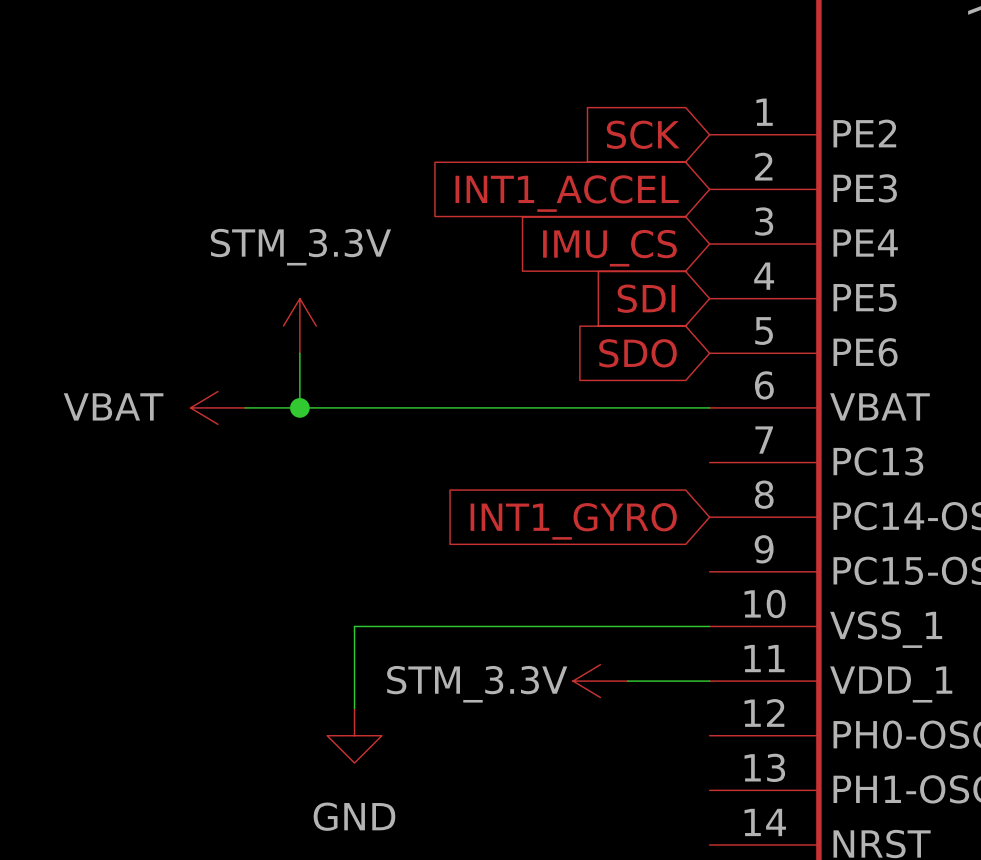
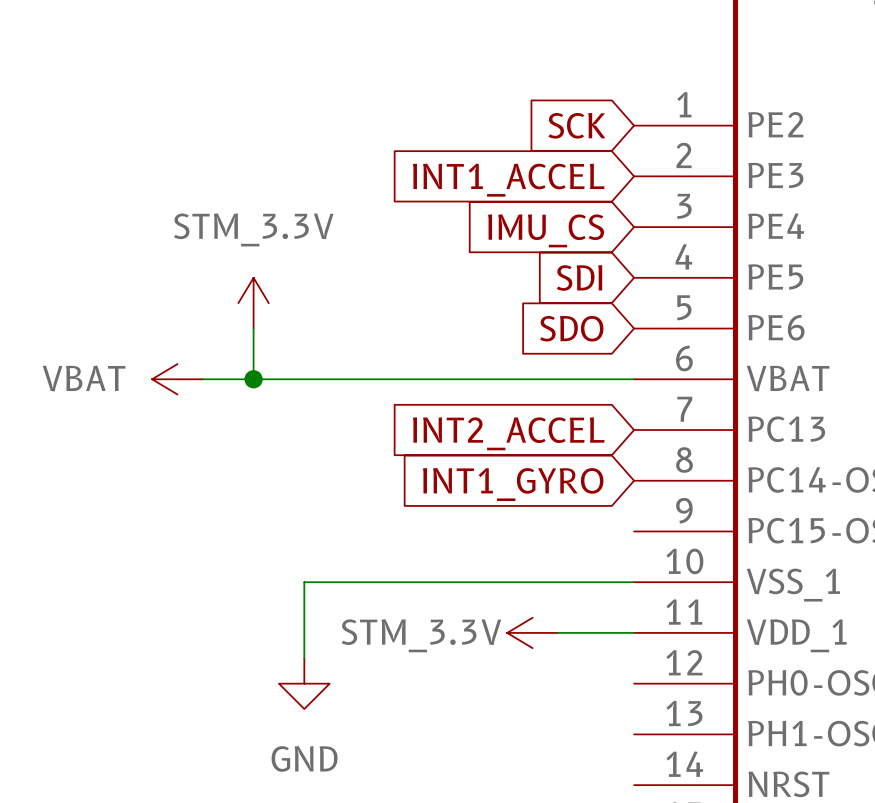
global label: none -> INT2_ACCEL (508, 433)

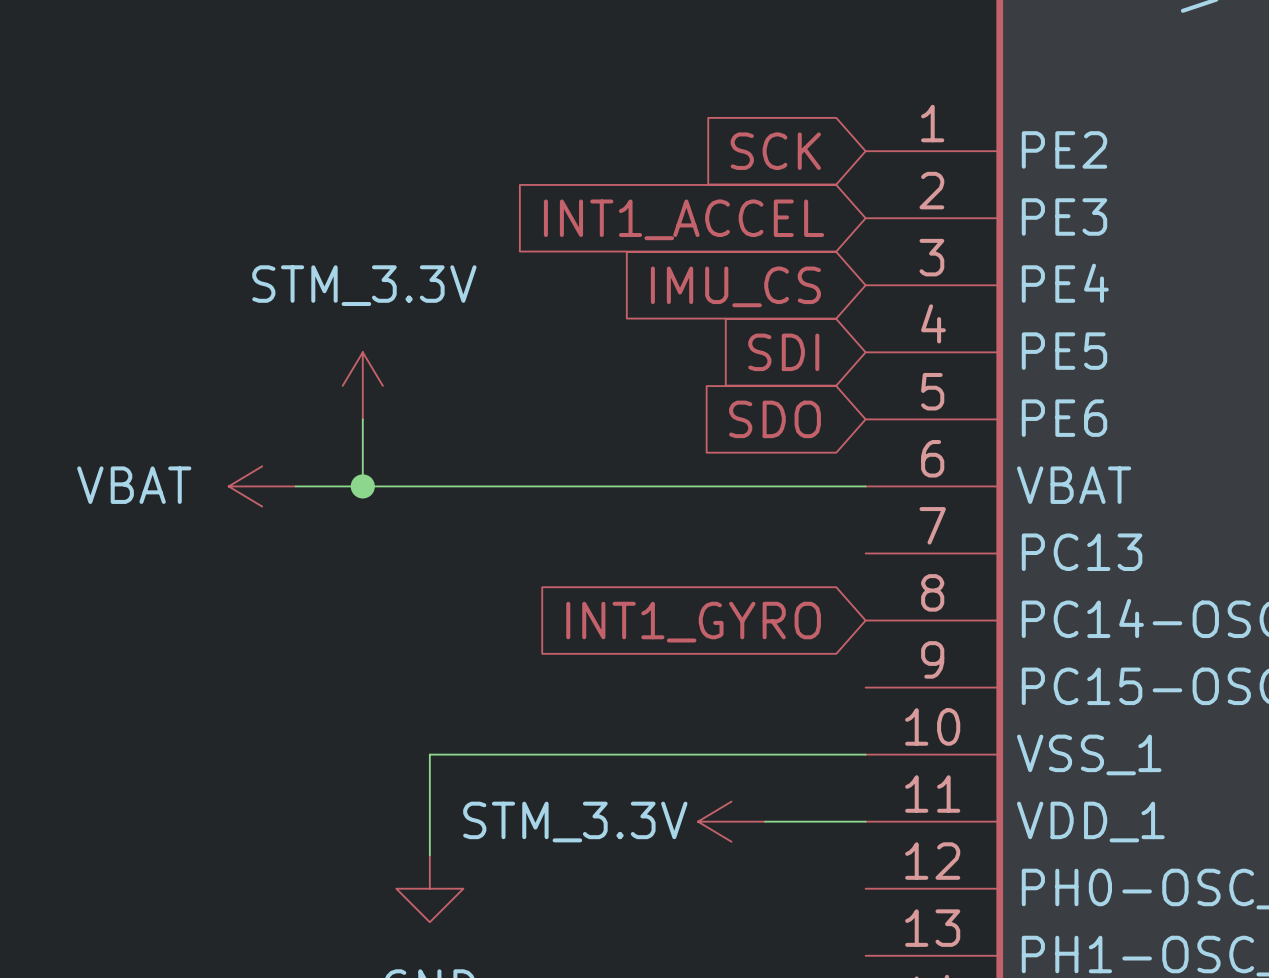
global label: INT2_ACCEL (508, 433) -> none

